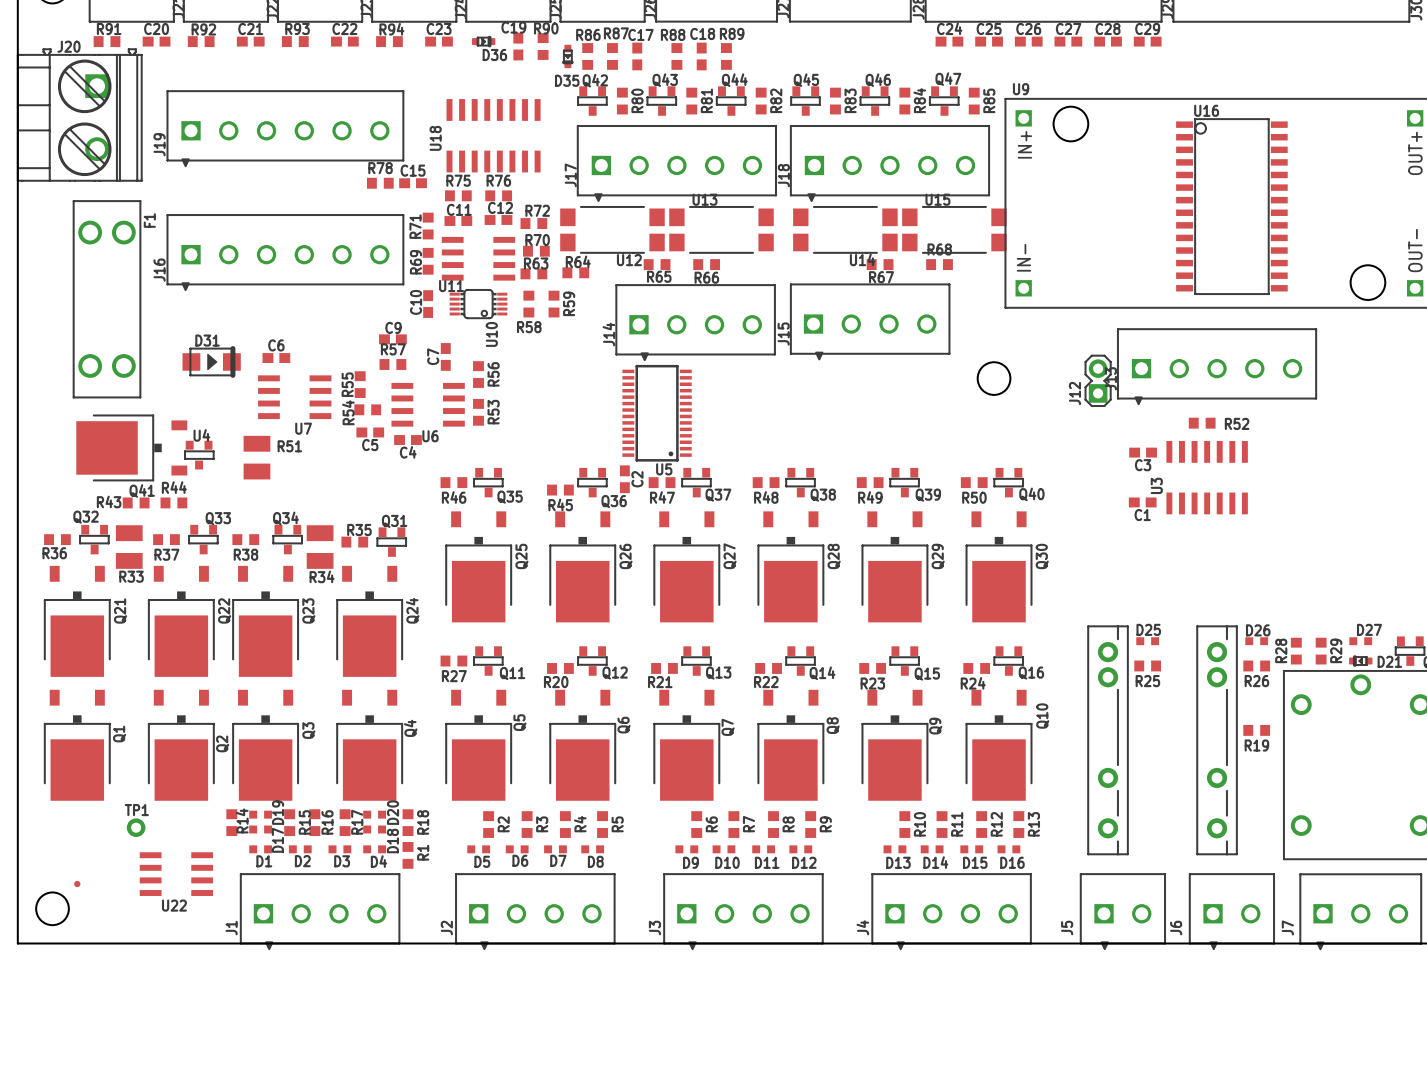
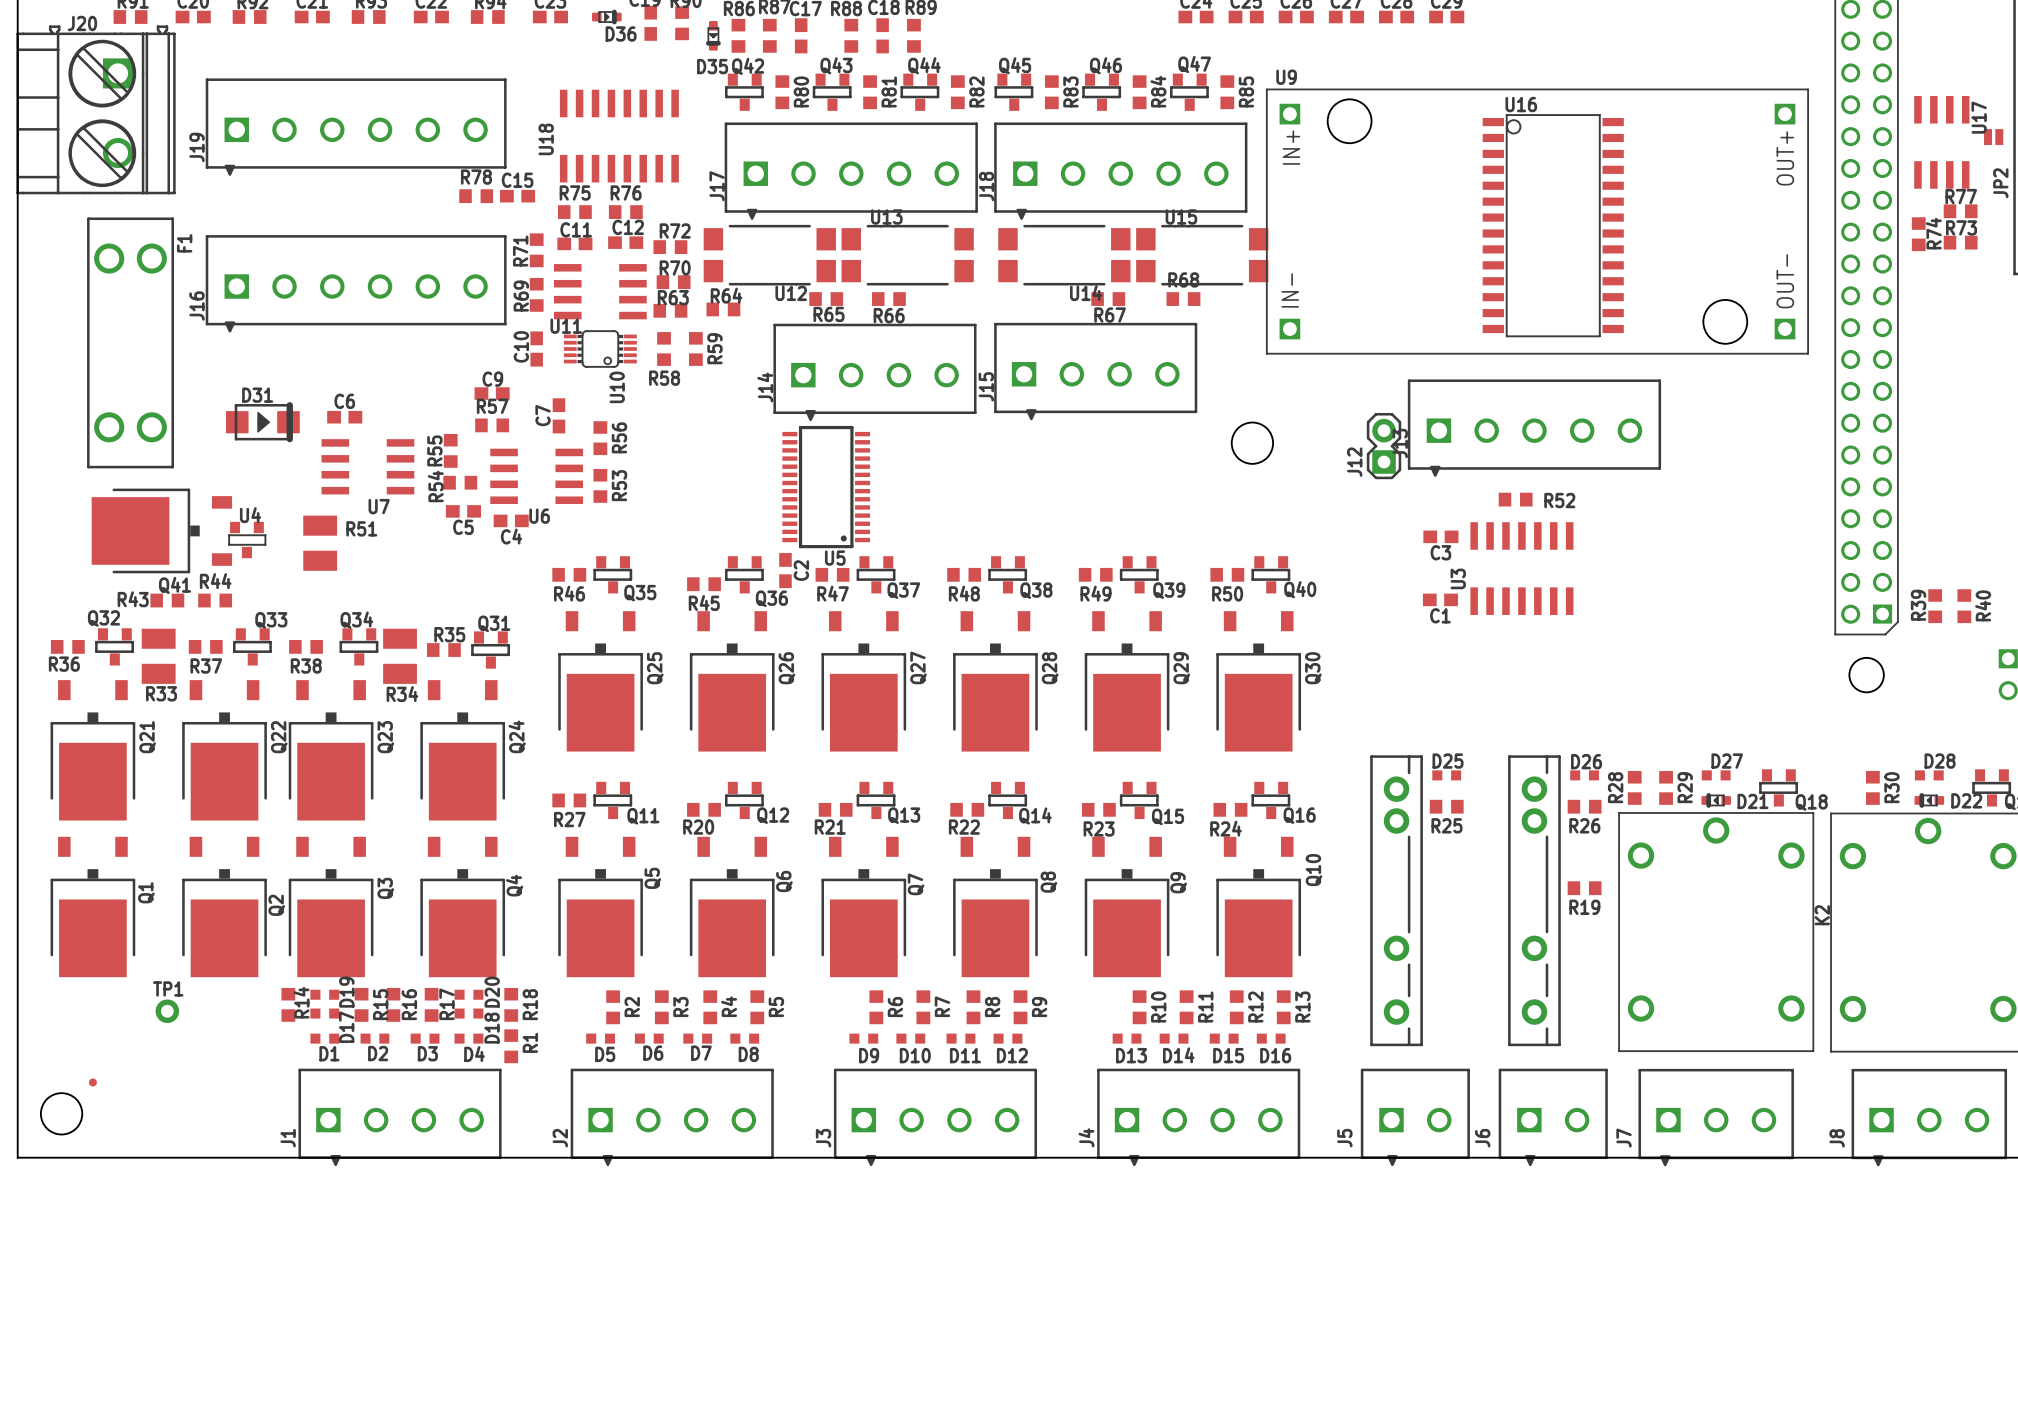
U22: (176, 874) -> none

